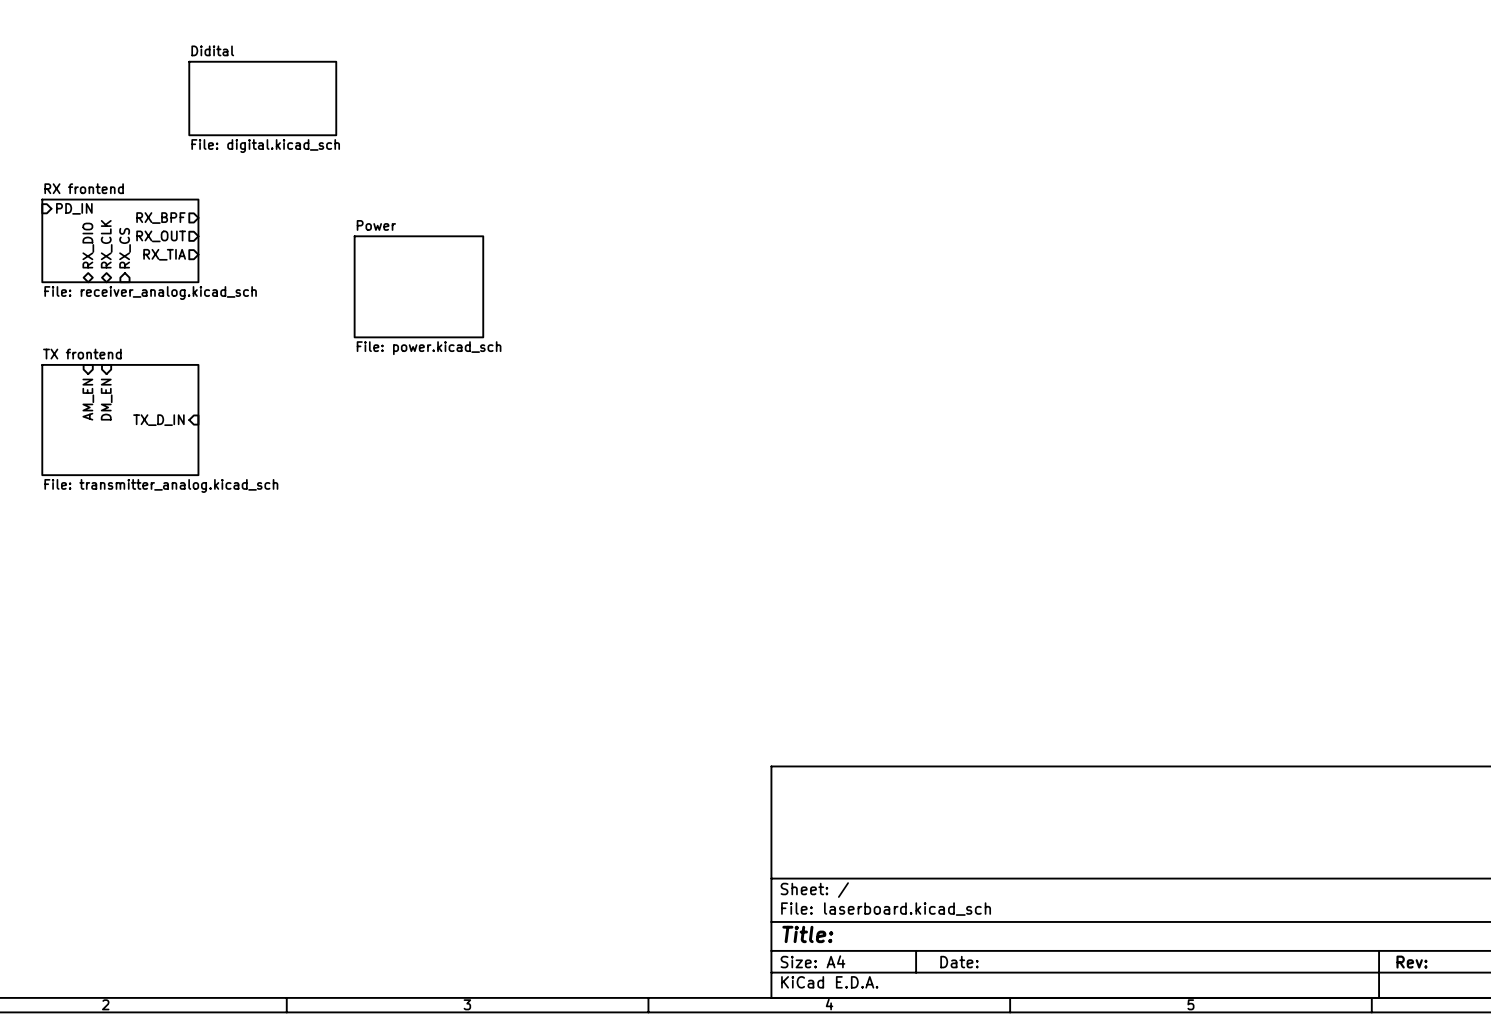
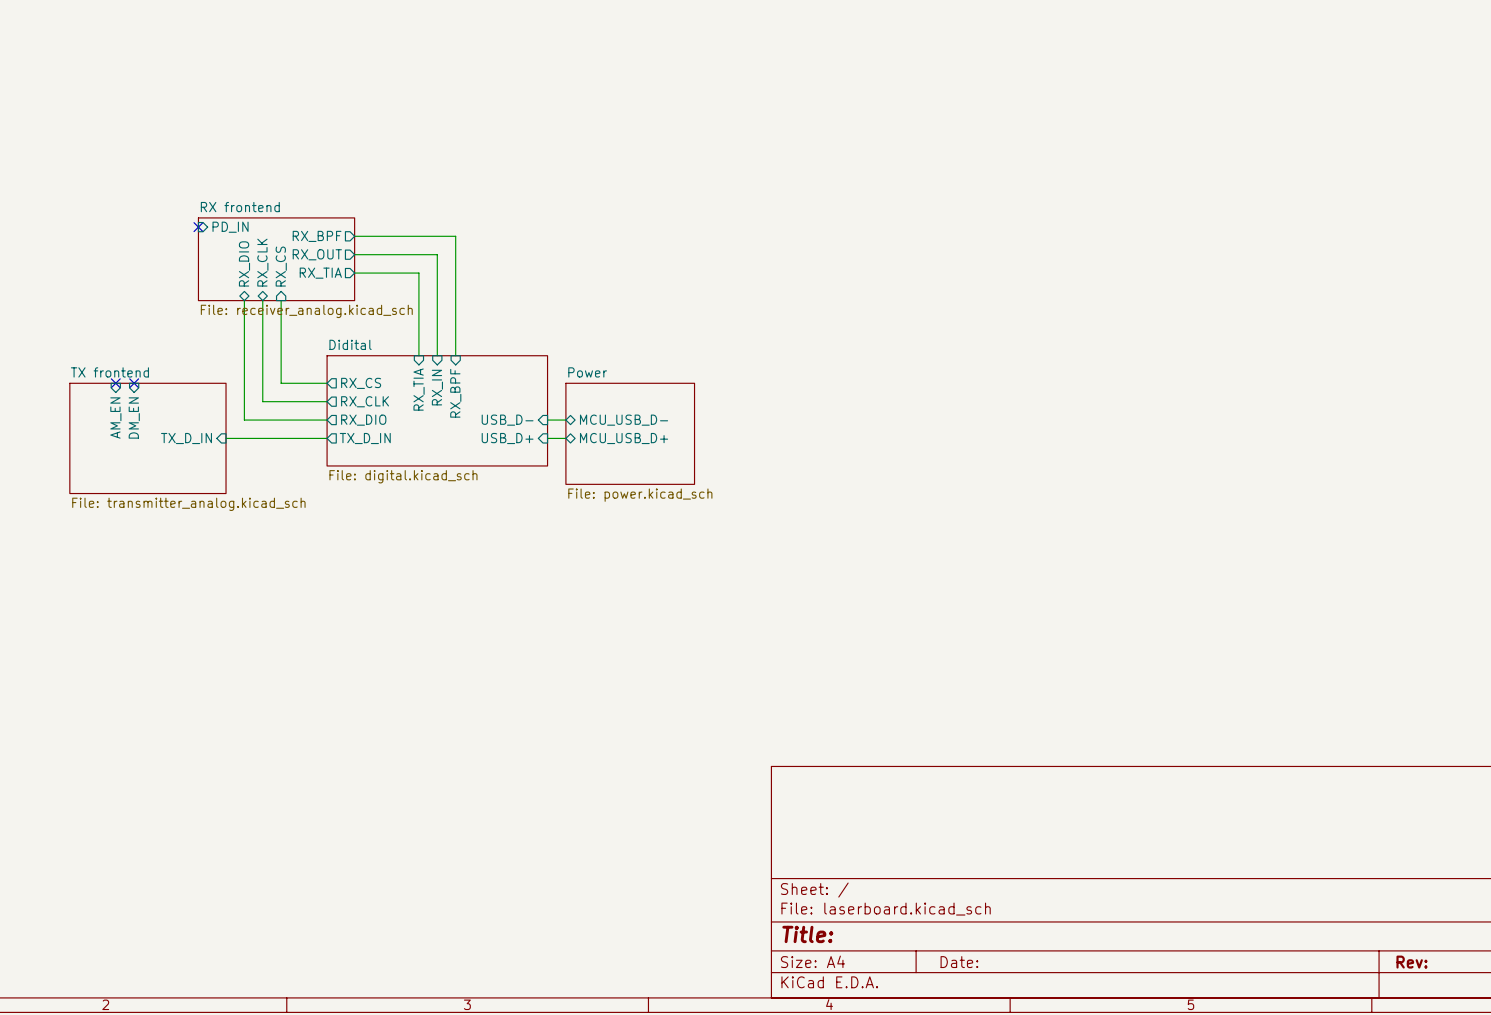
sheet Didital: File: digital.kicad_sch (262, 98) -> none
sheet pin position: PD_IN (74, 208) -> PD_IN (230, 227)
sheet pin: RX_BPF (160, 218) -> none
no-connect mark: none -> (198, 227)
sheet pin position: RX_OUT (161, 236) -> RX_OUT (317, 254)
sheet pin: none -> RX_BPF (317, 236)
wire: none -> (354, 236) (455, 236) (455, 355)
sheet RX frontend position: (120, 240) -> (276, 259)
sheet pin: RX_CLK (106, 244) -> none
sheet pin: RX_DIO (88, 245) -> none
sheet pin: RX_CS (125, 248) -> none
sheet pin: RX_TIA (164, 254) -> none
wire: none -> (354, 254) (437, 254) (437, 355)
sheet pin: none -> RX_CLK (262, 262)
sheet pin: none -> RX_DIO (244, 263)
sheet pin: none -> RX_CS (281, 266)
sheet pin: none -> RX_TIA (320, 273)
wire: none -> (354, 273) (418, 273) (418, 355)
sheet Power: File: power.kicad_sch (418, 286) -> none
wire: none -> (244, 300) (244, 420) (327, 420)
wire: none -> (262, 300) (262, 401) (327, 401)
wire: none -> (281, 300) (281, 383) (327, 383)
no-connect mark: none -> (115, 383)
no-connect mark: none -> (134, 383)
sheet pin: none -> RX_CS (361, 383)
sheet pin: none -> RX_IN (437, 387)
sheet pin: none -> RX_TIA (419, 389)
sheet pin: none -> RX_BPF (455, 393)
sheet pin position: AM_EN (88, 399) -> AM_EN (115, 417)
sheet pin position: DM_EN (106, 399) -> DM_EN (134, 417)
sheet pin: none -> RX_CLK (365, 401)
sheet Didital: none -> File: digital.kicad_sch (437, 410)
sheet TX frontend position: (120, 420) -> (147, 438)
sheet pin position: TX_D_IN (158, 420) -> TX_D_IN (186, 438)
sheet pin: none -> RX_DIO (363, 420)
sheet pin: none -> USB_D- (507, 420)
wire: none -> (547, 420) (565, 420)
sheet pin: none -> MCU_USB_D- (624, 420)
sheet Power: none -> File: power.kicad_sch (630, 433)
wire: none -> (226, 438) (327, 438)
sheet pin: none -> TX_D_IN (365, 438)
sheet pin: none -> USB_D+ (507, 438)
wire: none -> (547, 438) (565, 438)
sheet pin: none -> MCU_USB_D+ (624, 438)

